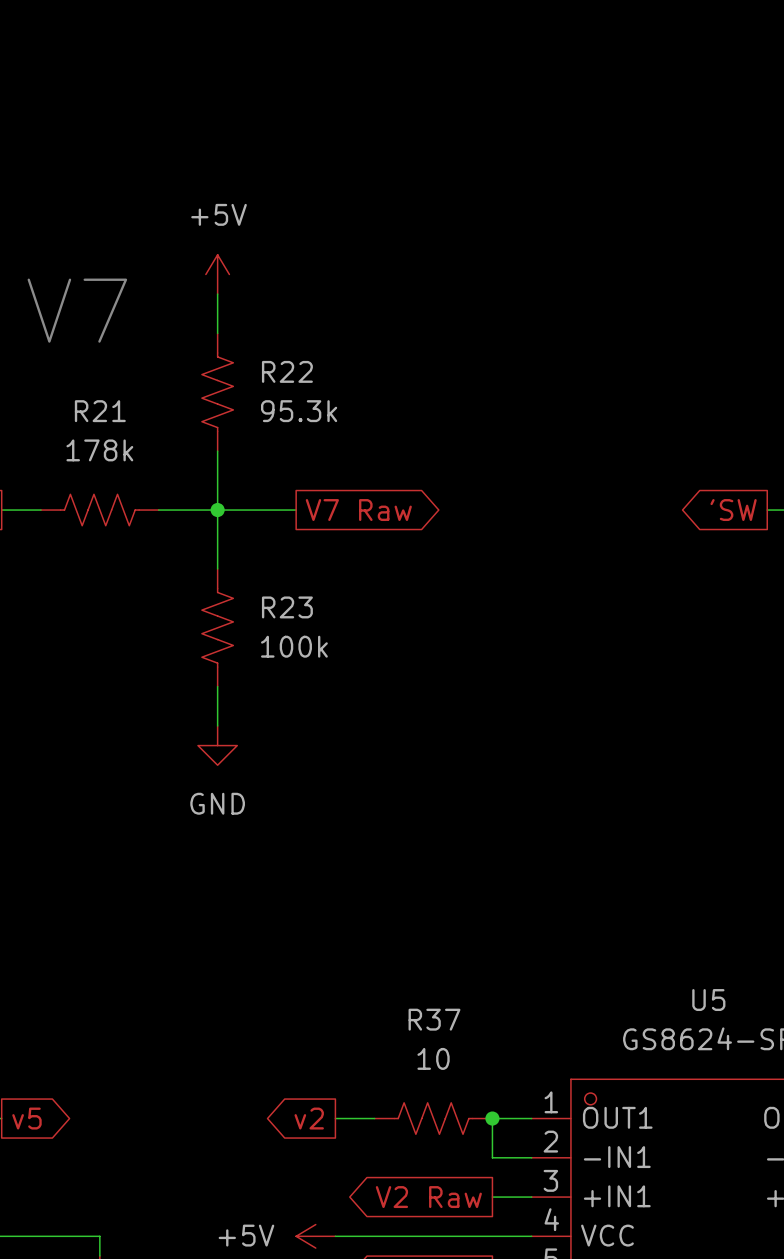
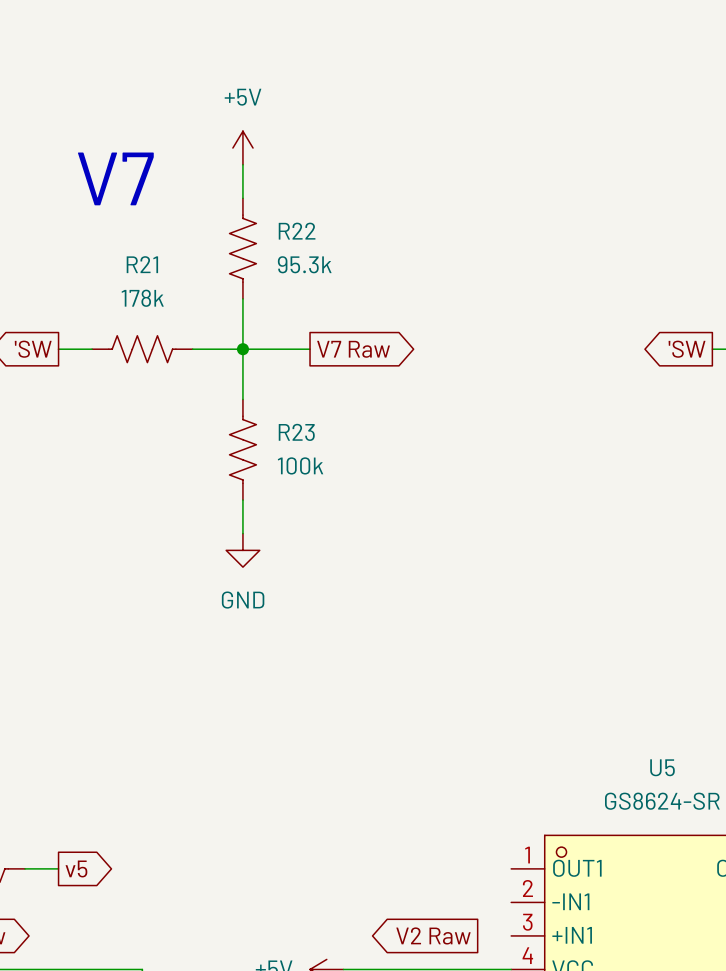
global label: v2 (309, 1118) -> none
wire: (335, 1118) (374, 1118) -> none
R37: 10 (433, 1118) -> none
junction: (492, 1118) -> none
wire: (531, 1118) (492, 1118) (492, 1157) (531, 1157) -> none
wire: (492, 1197) (531, 1197) -> none

